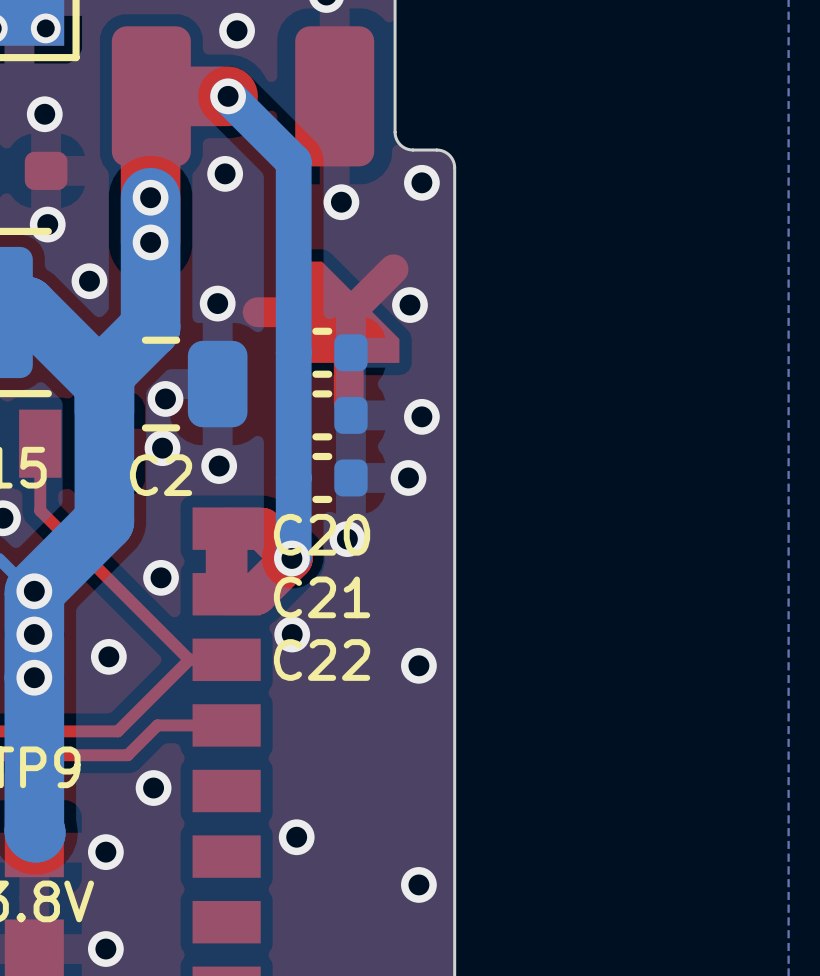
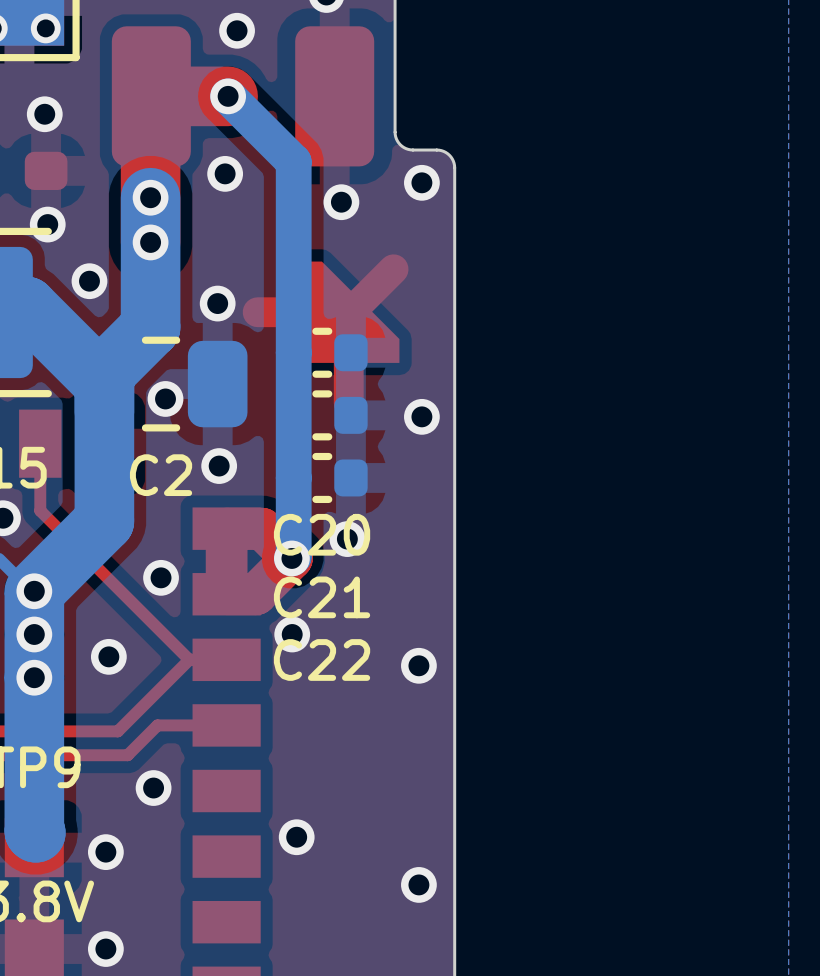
via: (409, 305) -> none
via: (162, 448) -> none
via: (408, 477) -> none

